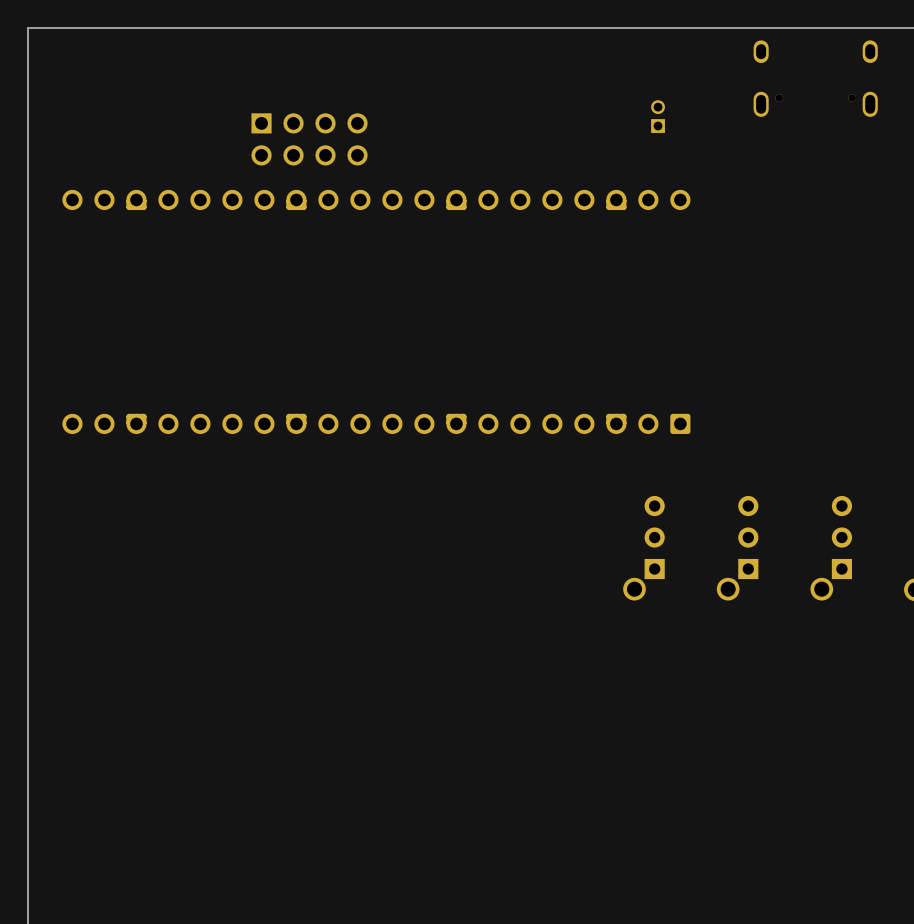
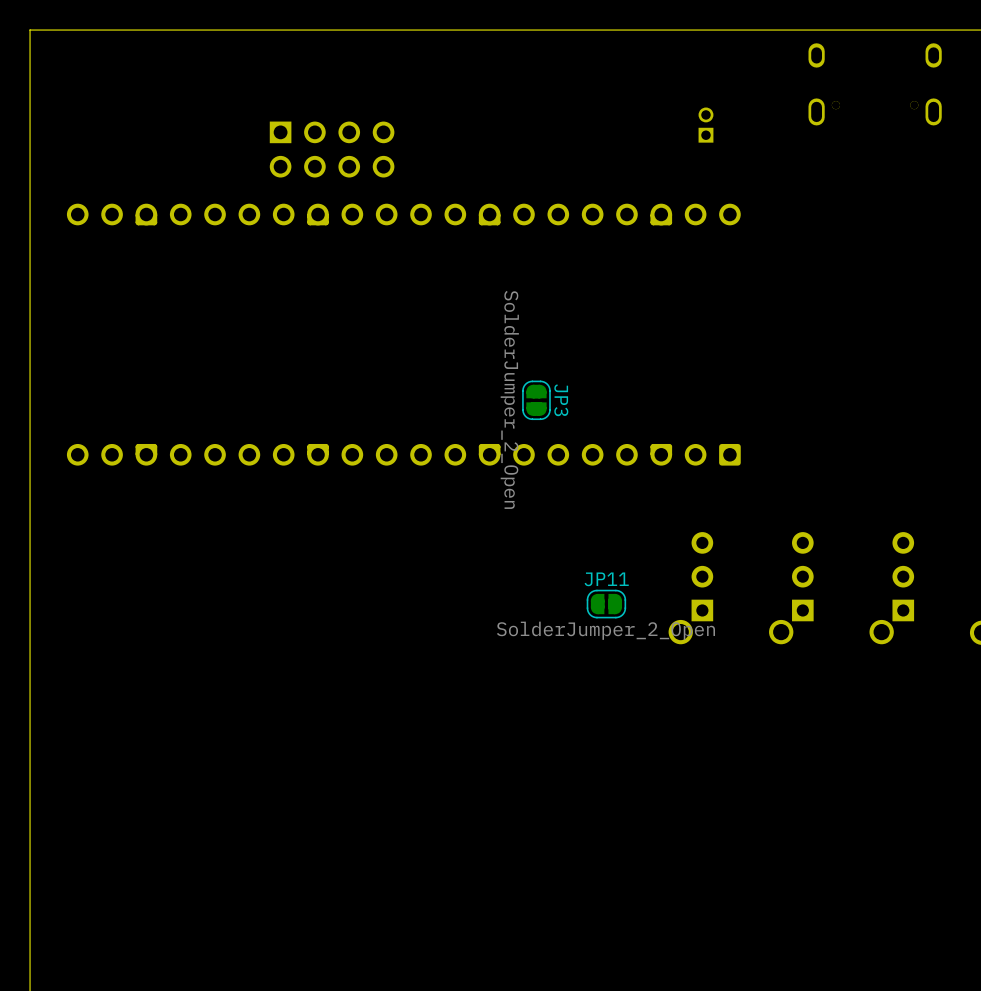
JP3: none -> SolderJumper_2_Open (536, 400)
JP11: none -> SolderJumper_2_Open (606, 604)

